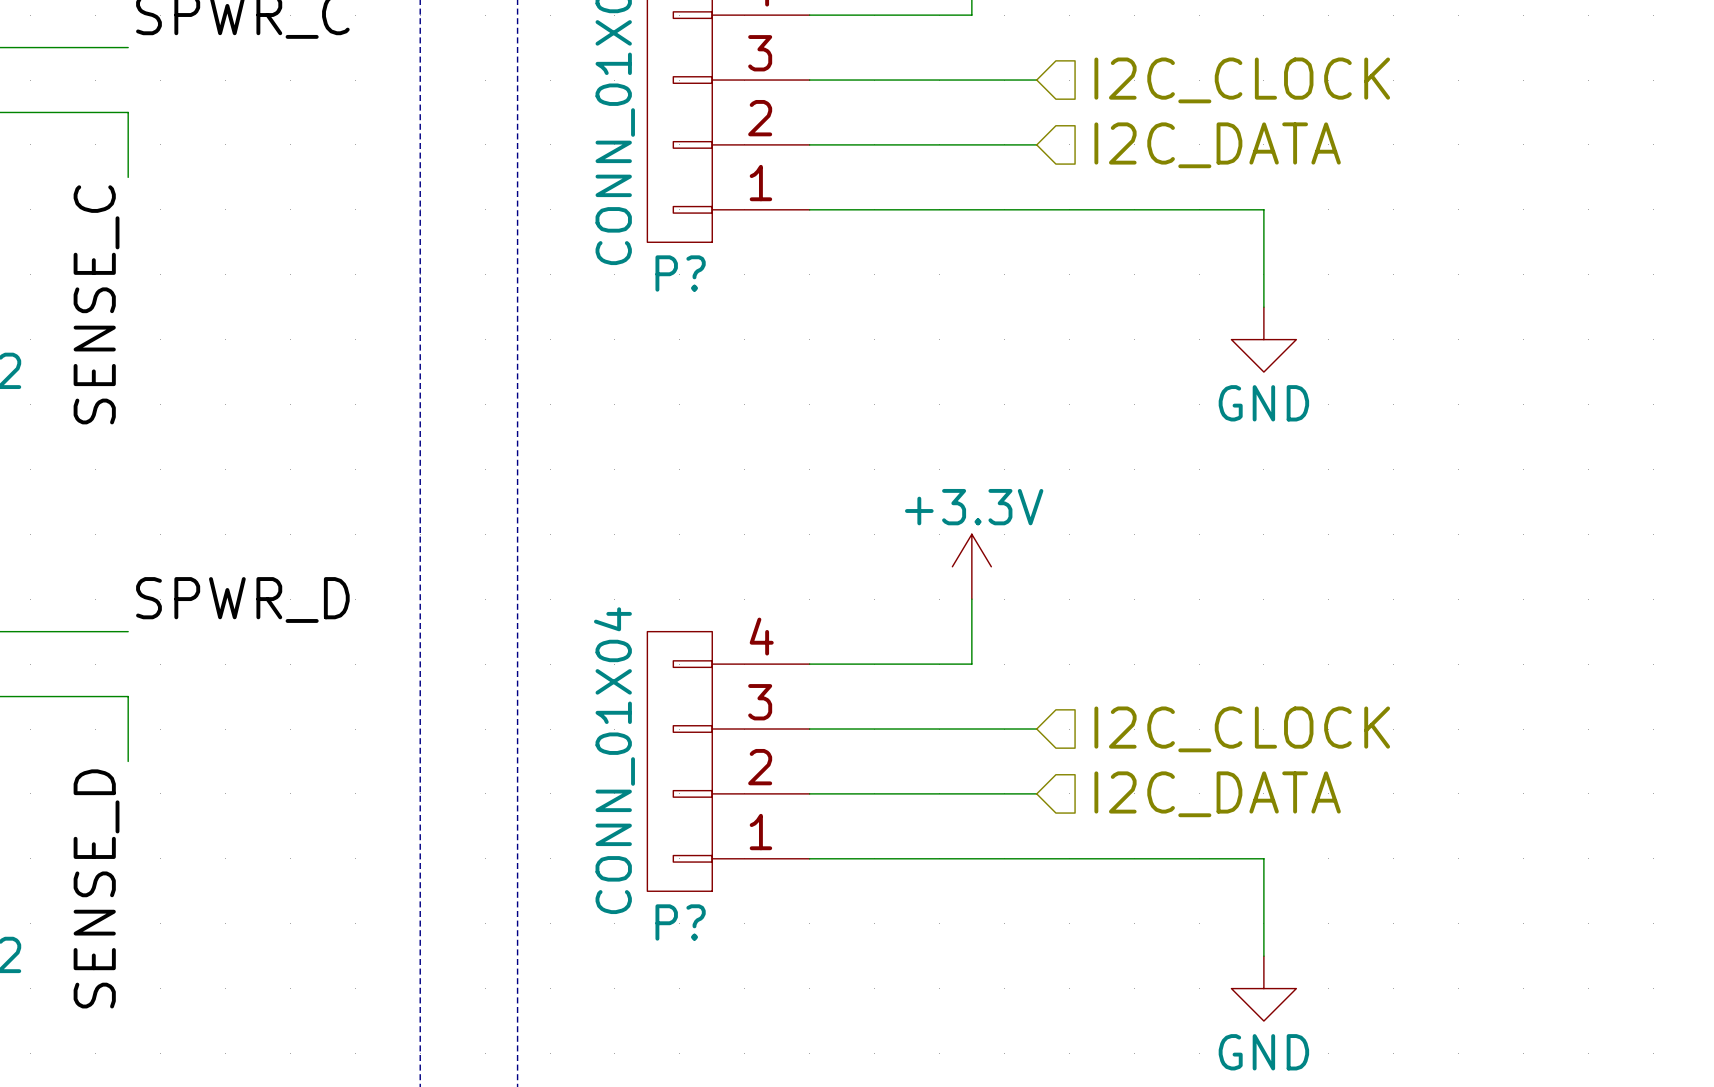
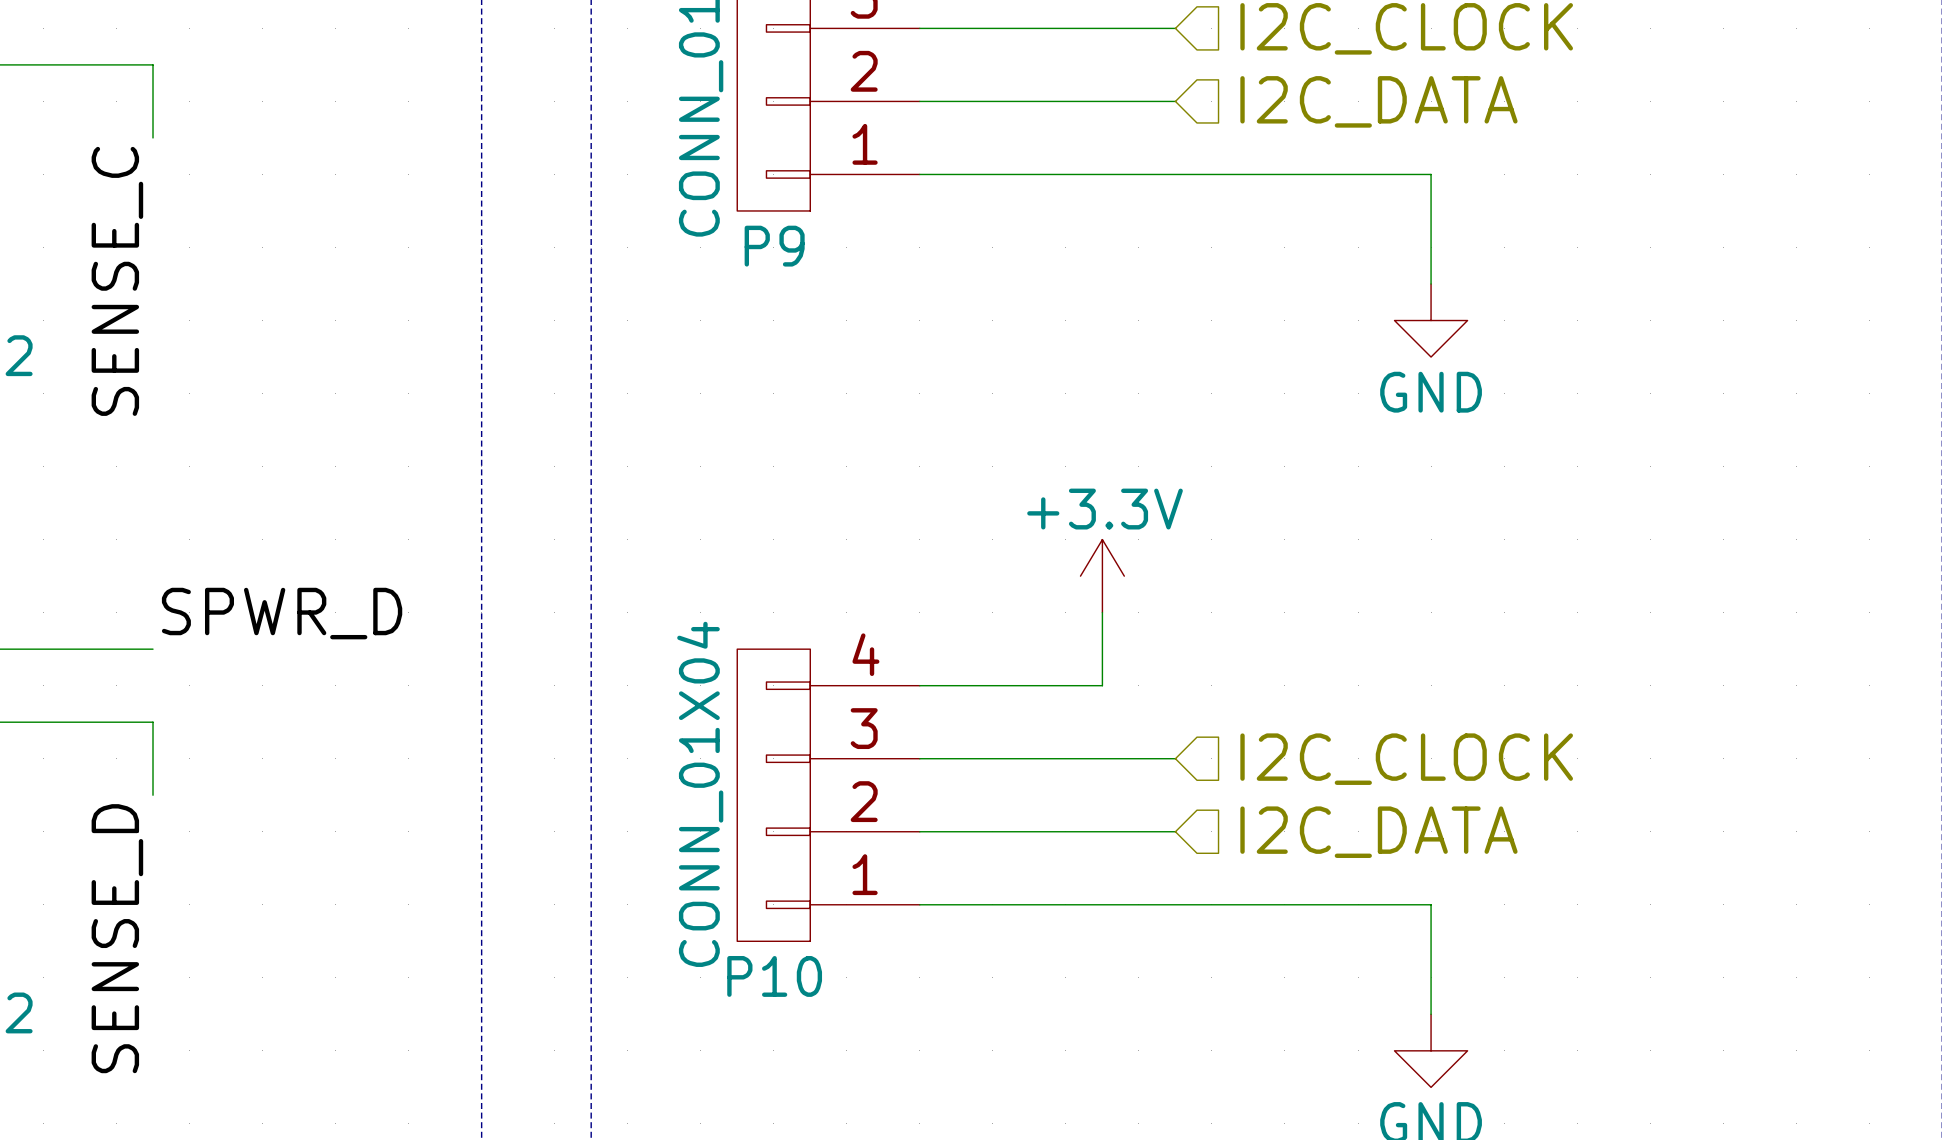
P? name: P? (680, 273) -> P9 (774, 246)
P? name: P? (680, 922) -> P10 (774, 976)

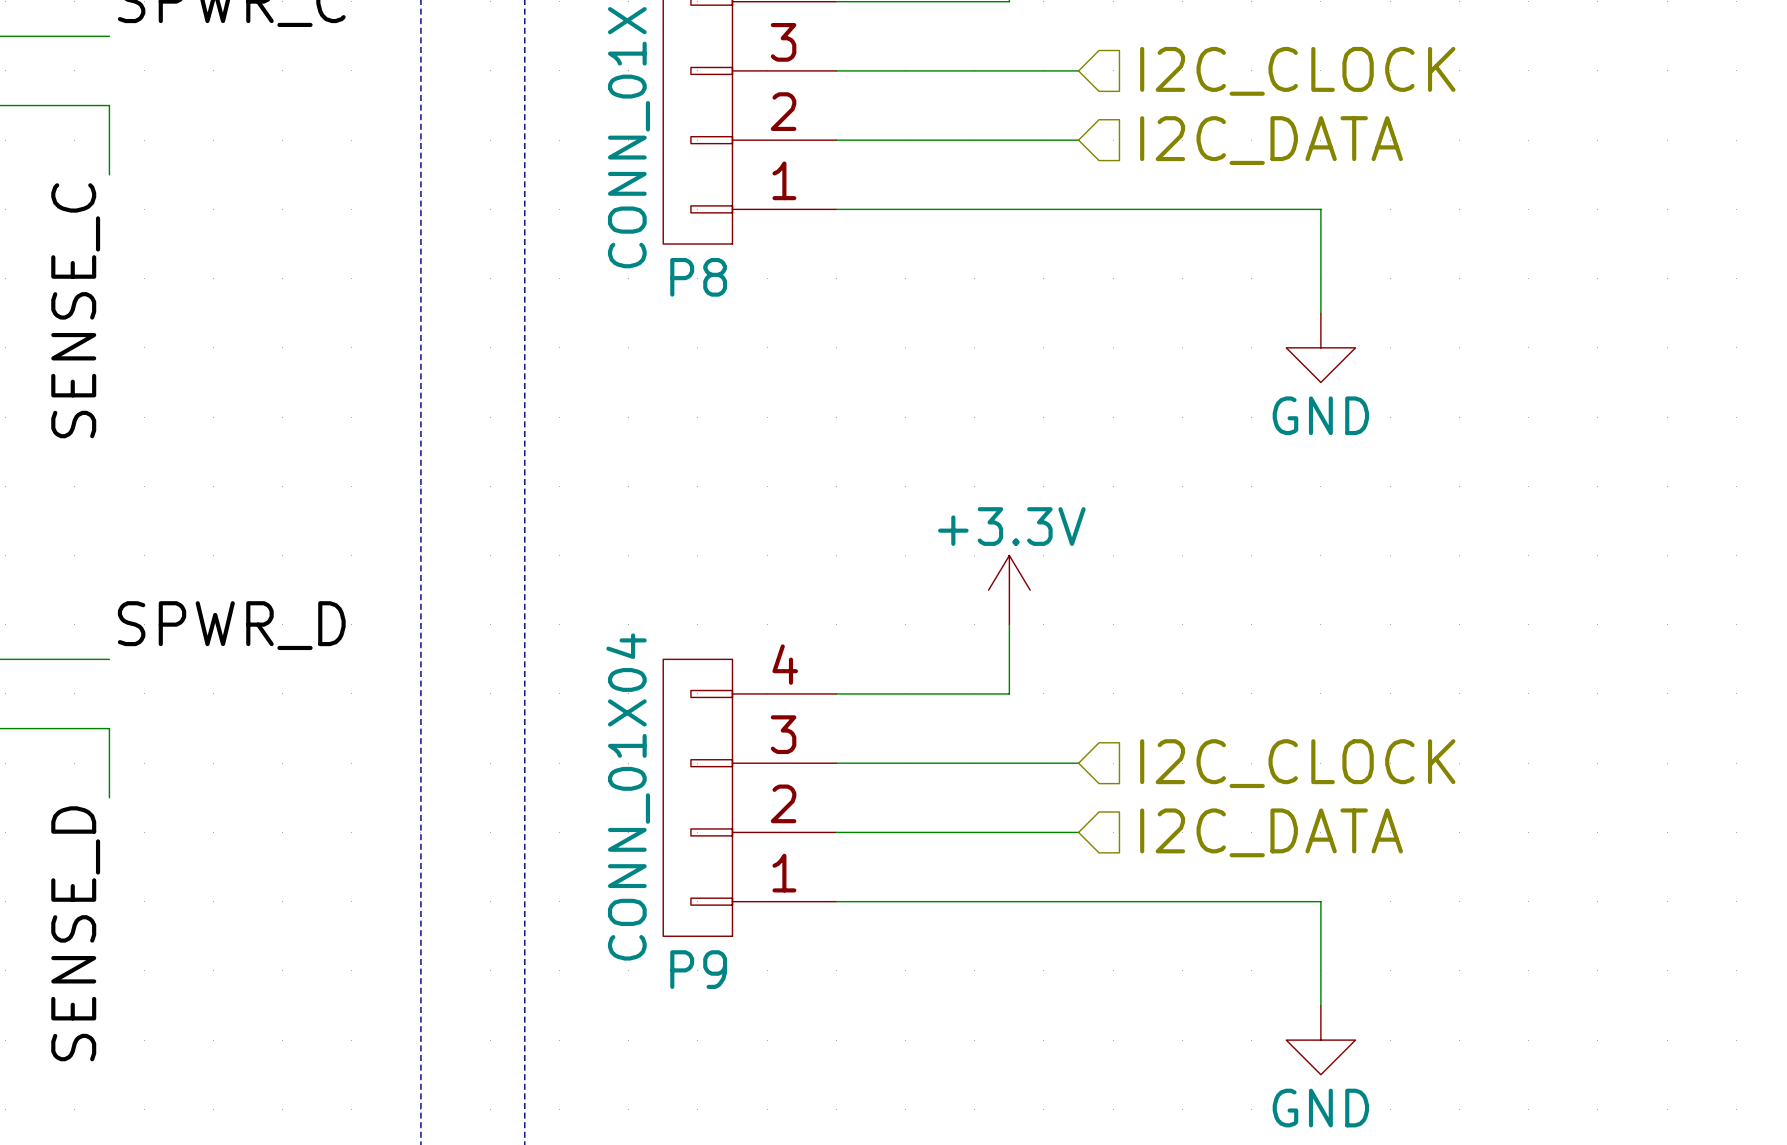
P9 name: P9 (774, 246) -> P8 (698, 277)
P10 name: P10 (774, 976) -> P9 (698, 969)

